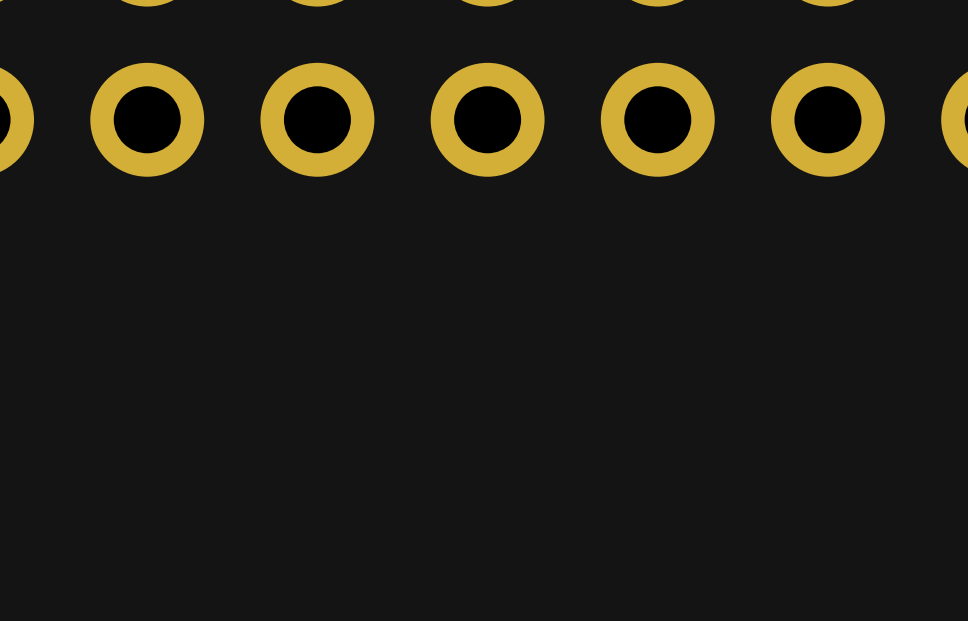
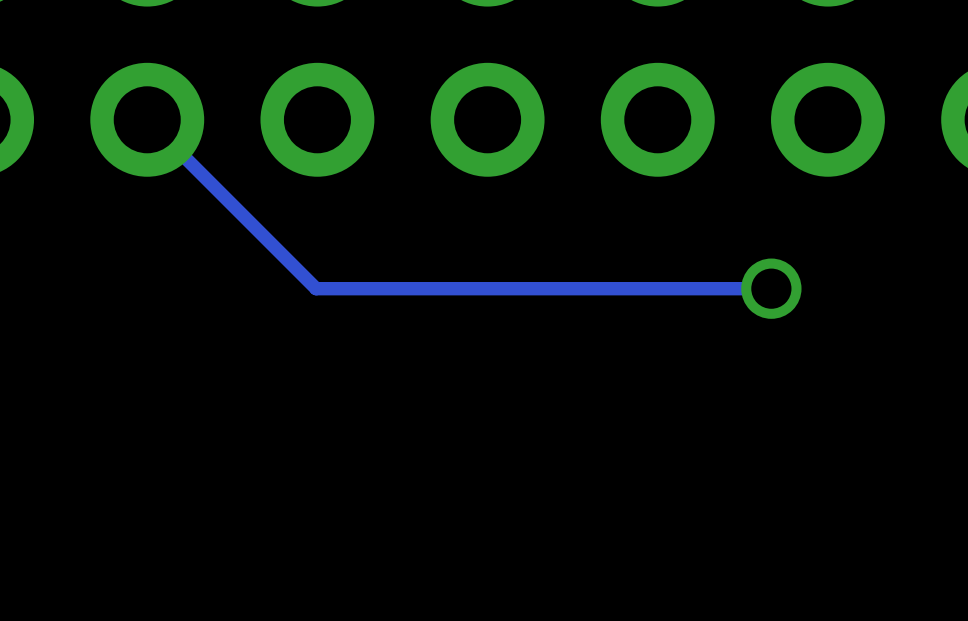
track: none -> (147, 119) (316, 288) (771, 288)
via: none -> (771, 288)

